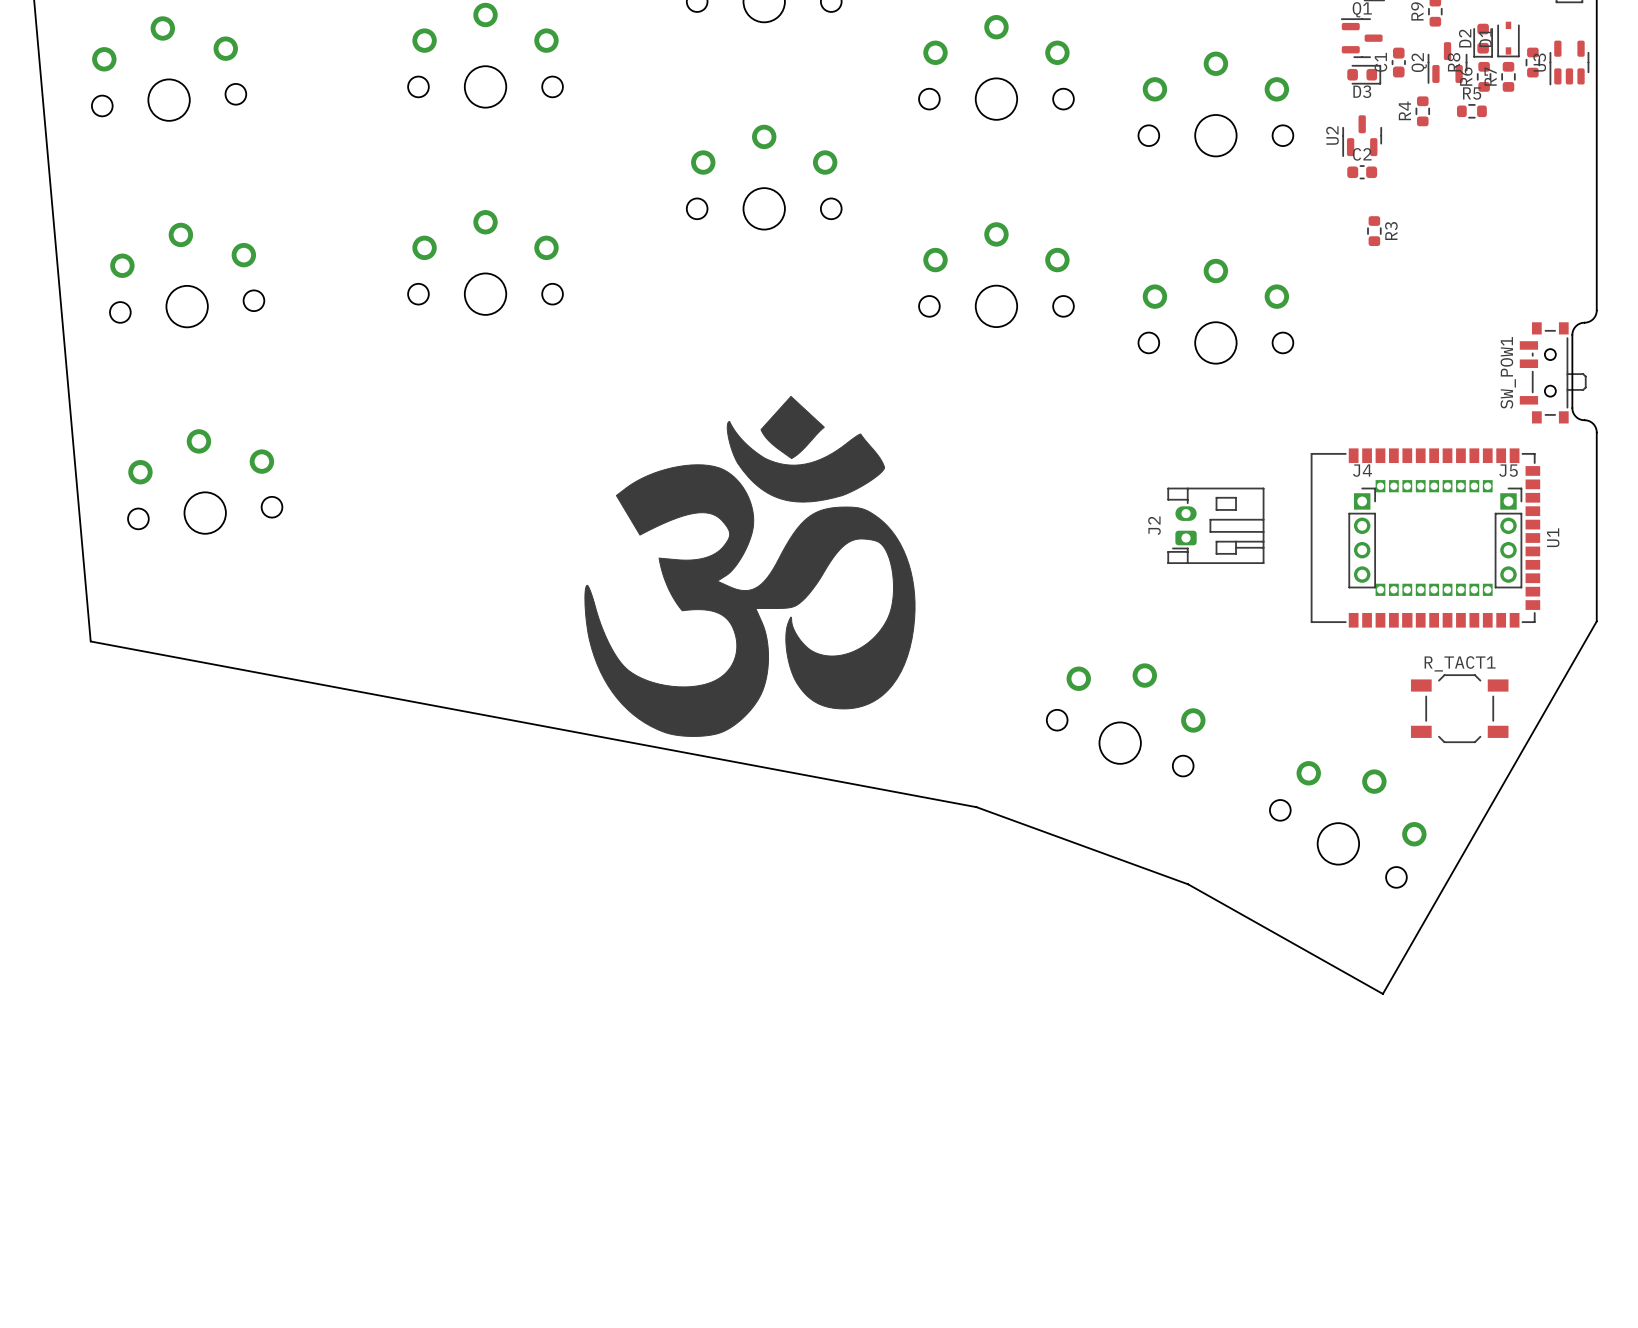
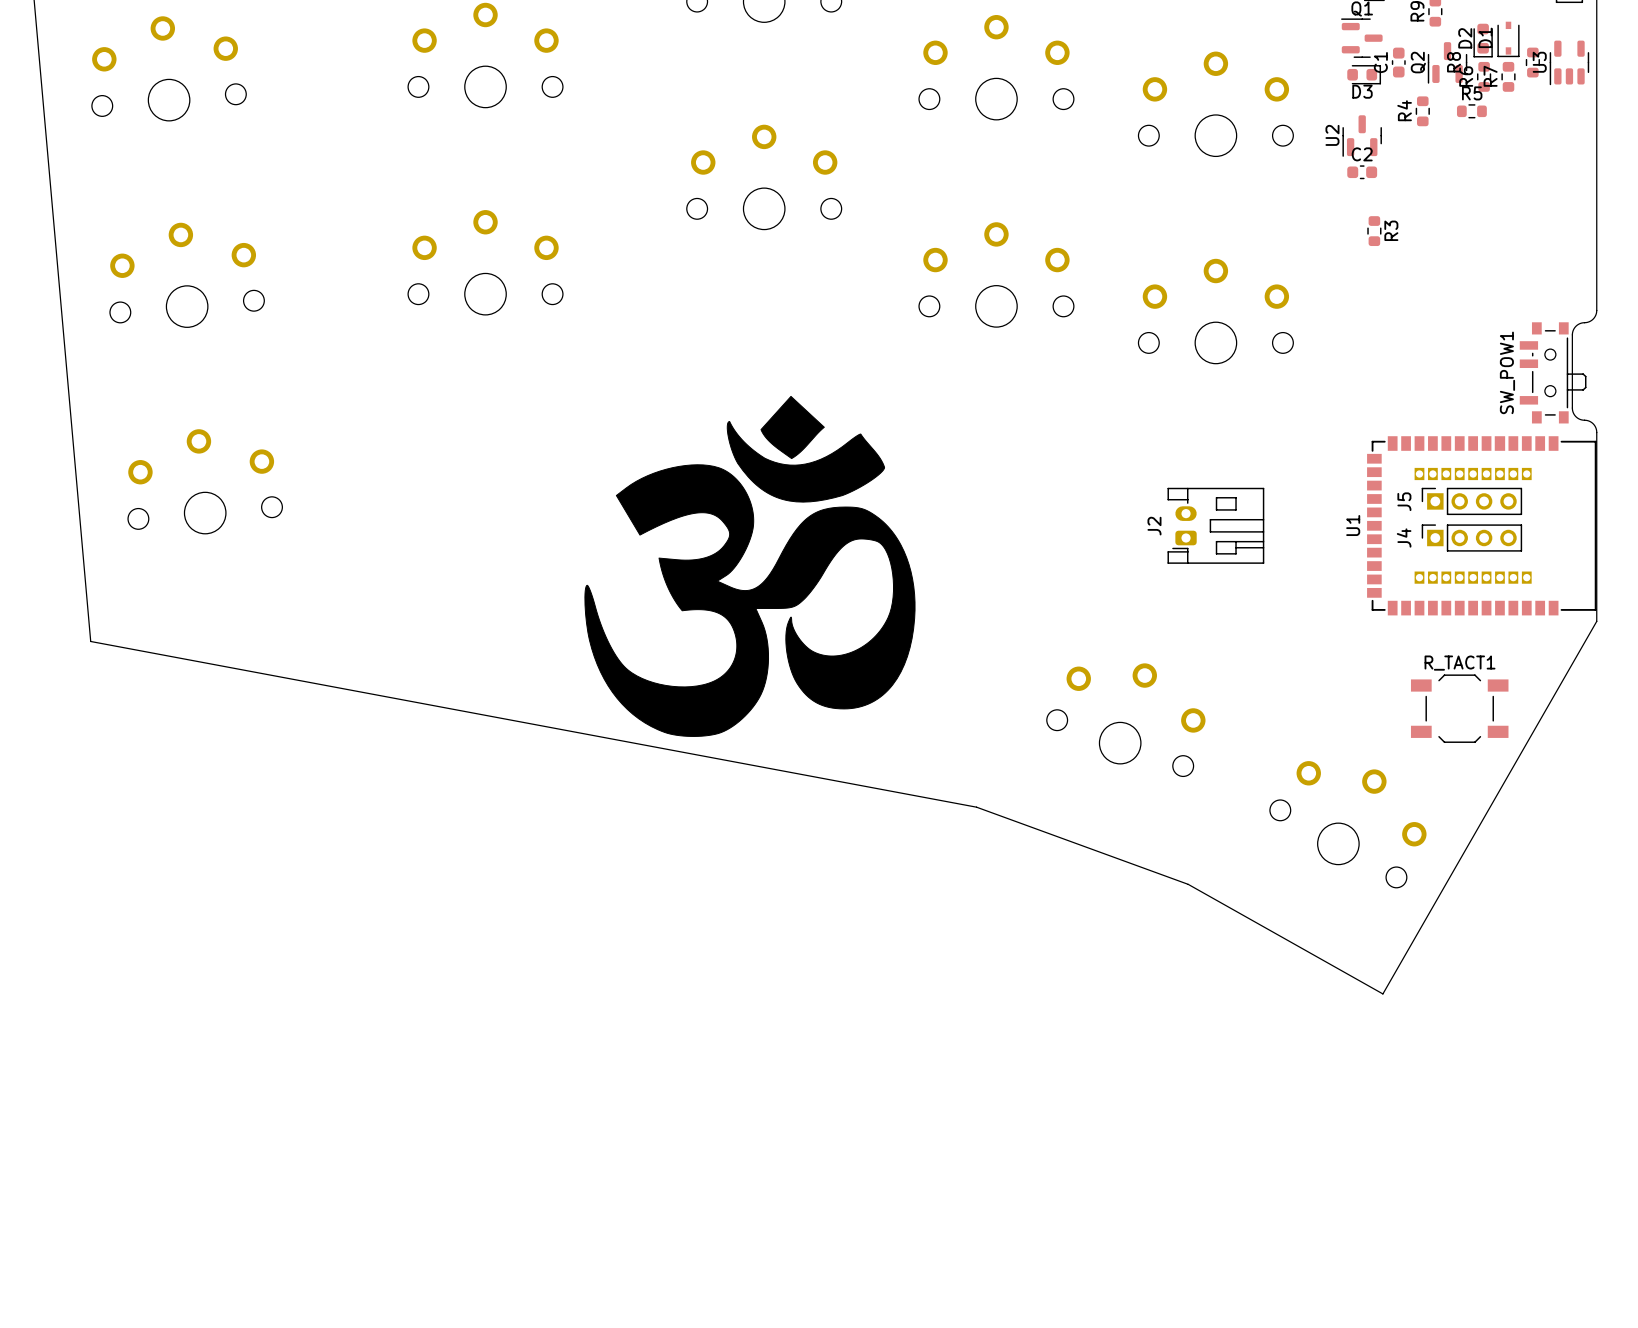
J4 rotation: 0° (1362, 538) -> 90° counterclockwise (1471, 538)
J4 position: (1362, 538) -> (1471, 538)
U1 rotation: 0° (1425, 538) -> 180° (1481, 525)
J5 rotation: 0° (1508, 538) -> 90° counterclockwise (1471, 501)

